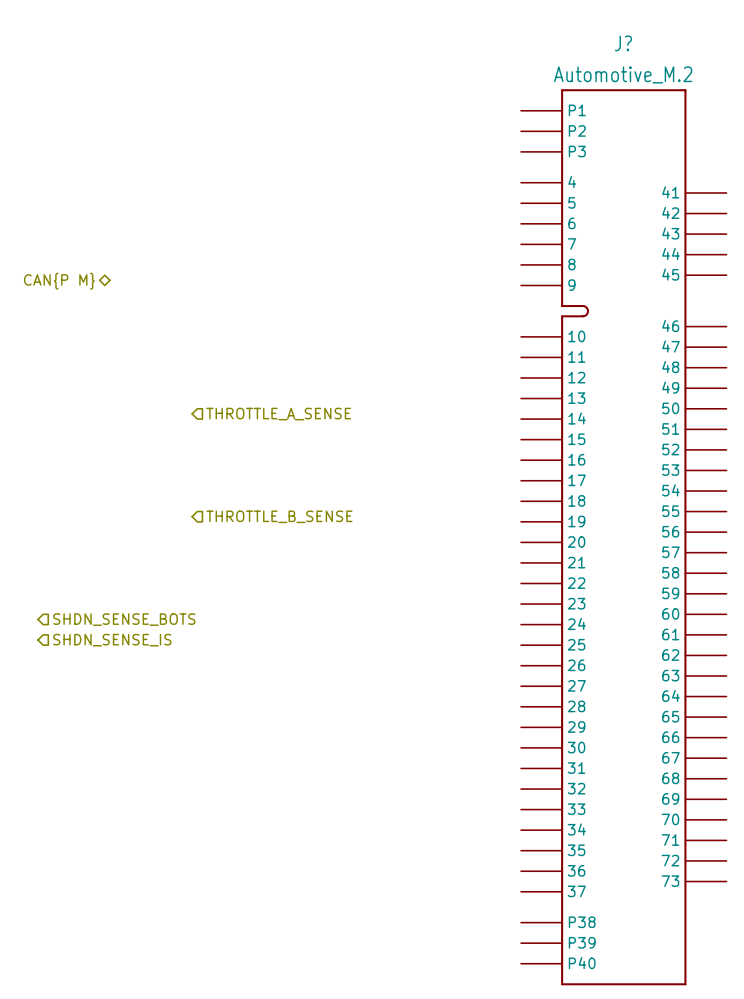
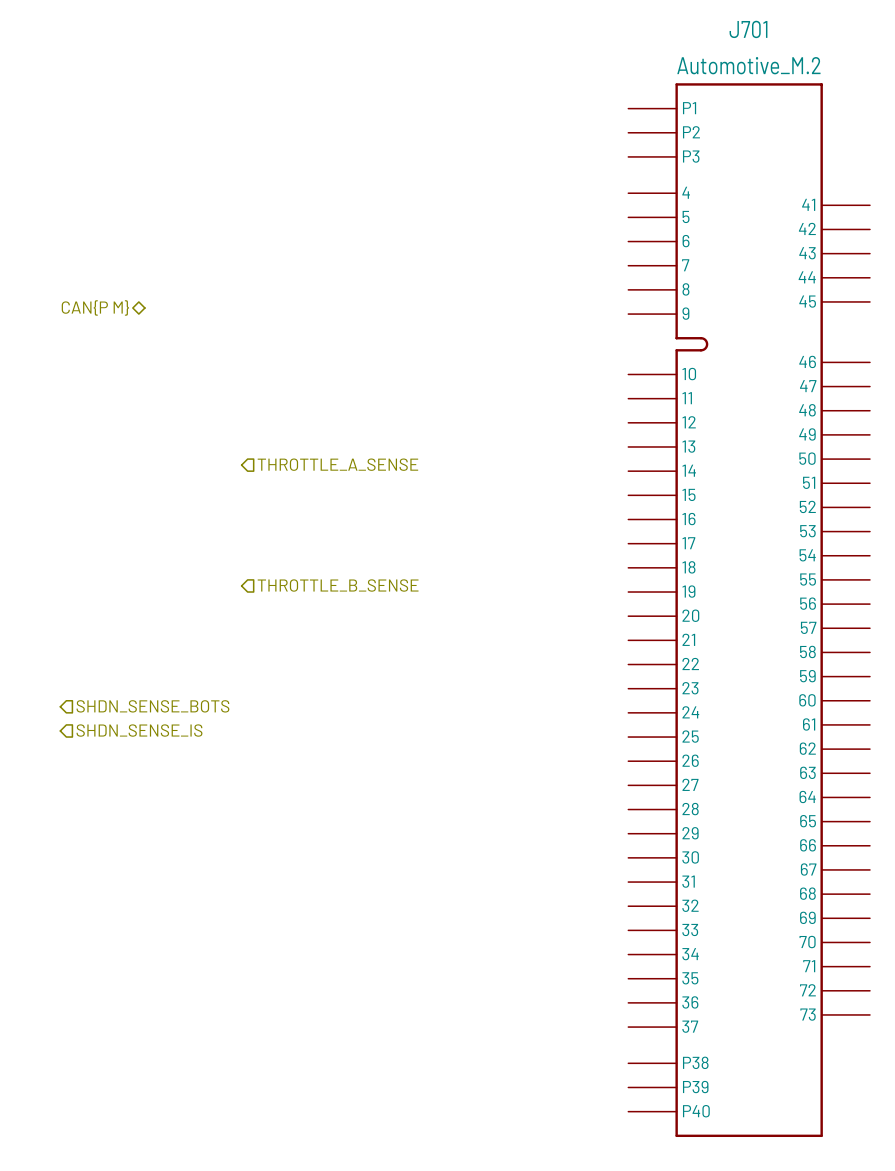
J? name: J? (623, 43) -> J701 (748, 29)

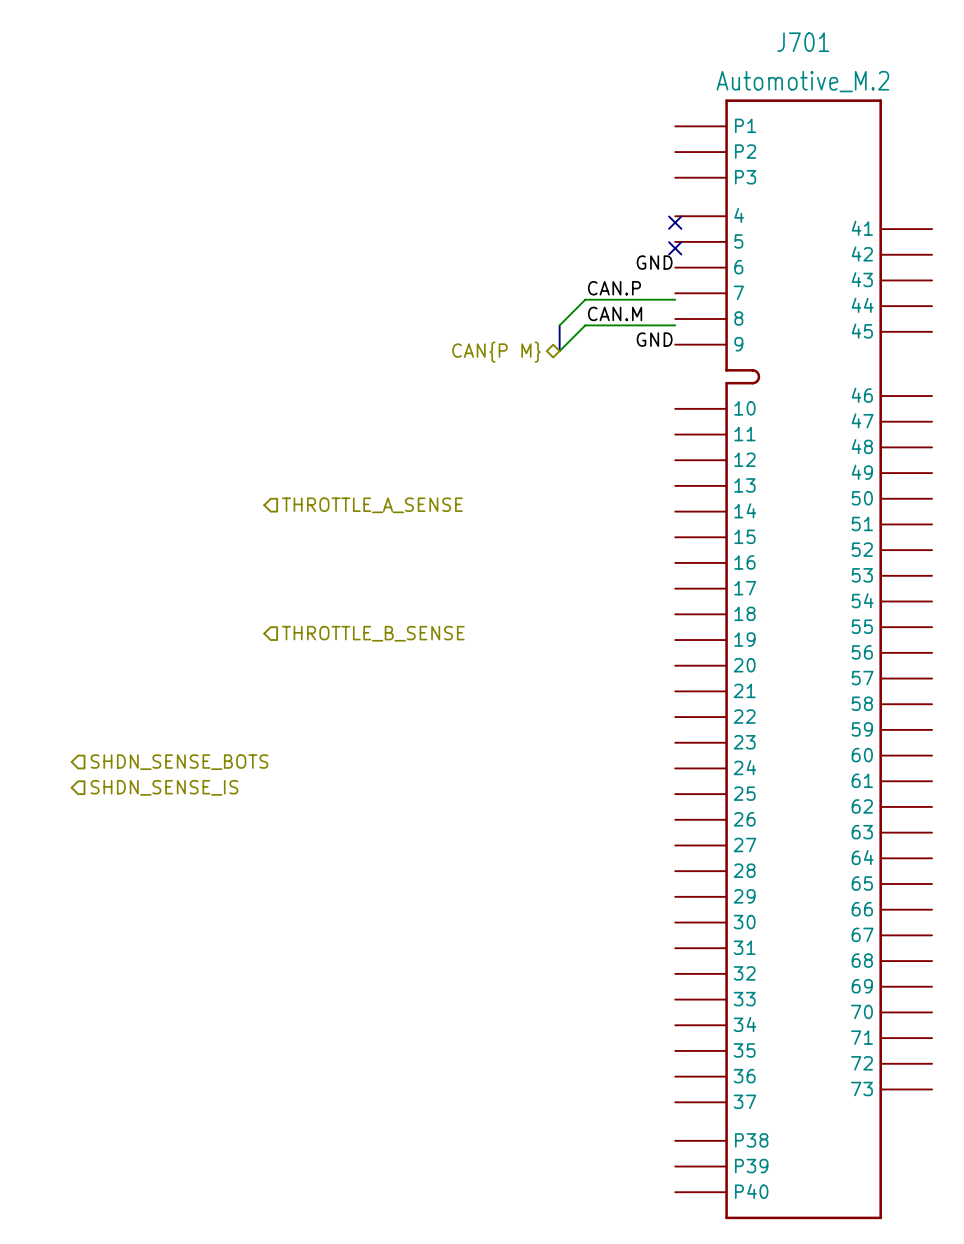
no-connect mark: none -> (675, 222)
no-connect mark: none -> (675, 248)
label: none -> GND (654, 262)
label: none -> CAN.P (614, 288)
wire: none -> (675, 299) (585, 299) (559, 325)
label: none -> CAN.M (615, 313)
bus: none -> (559, 325) (559, 351)
wire: none -> (675, 325) (585, 325) (559, 351)
hierarchical label: CAN{P M} (95, 307) -> none
label: none -> GND (654, 339)
hierarchical label: none -> CAN{P M} (496, 352)

